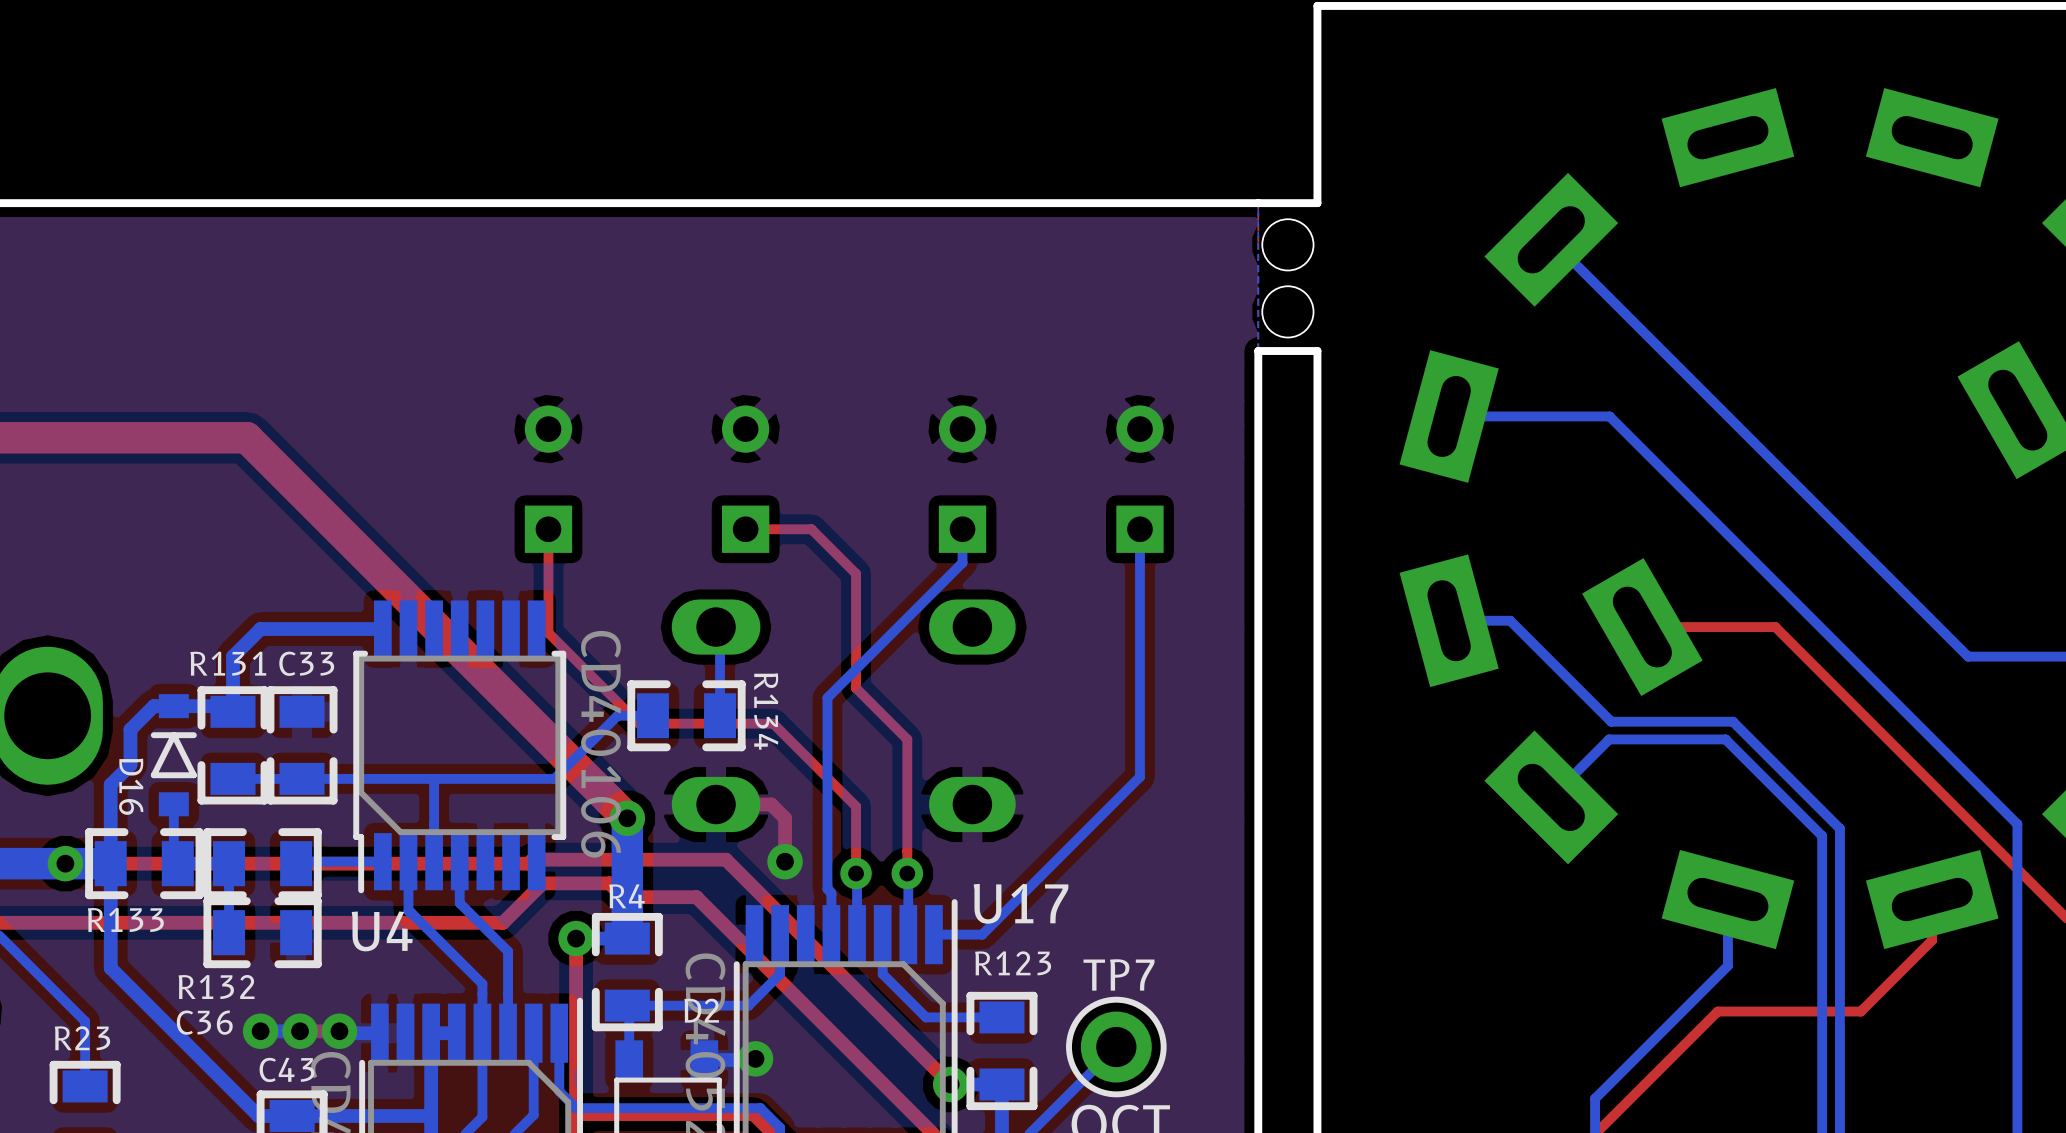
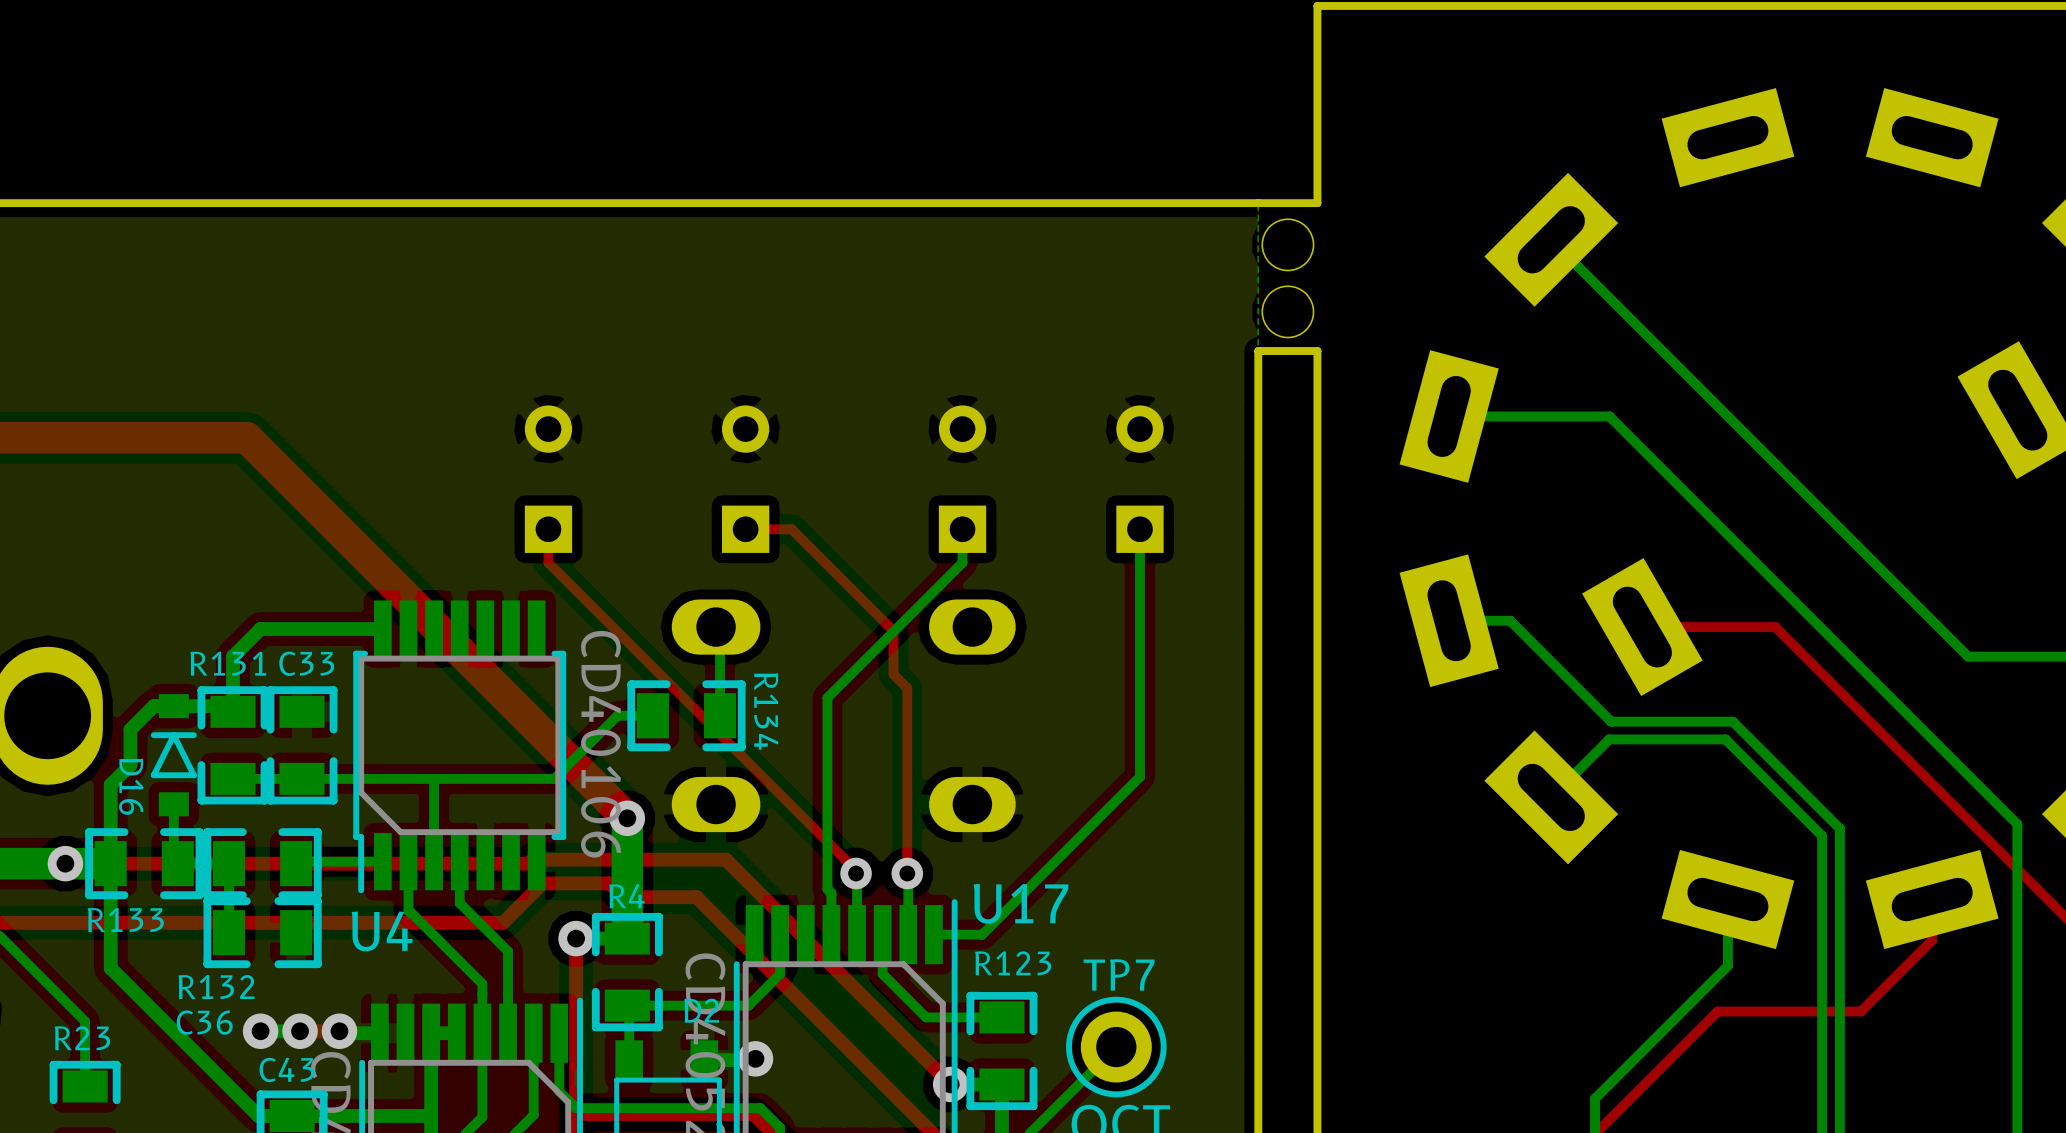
top track: (791, 529) (811, 529) (856, 573) (856, 688) (907, 739) -> (791, 529) (893, 630) (893, 674) (907, 688) (907, 739)
top track: (548, 562) (548, 632) (639, 723) (773, 723) (856, 806) (856, 870) -> (548, 562) (856, 870)
top track: (716, 804) (771, 804) (785, 818) (785, 861) -> none
via: (785, 861) -> none

